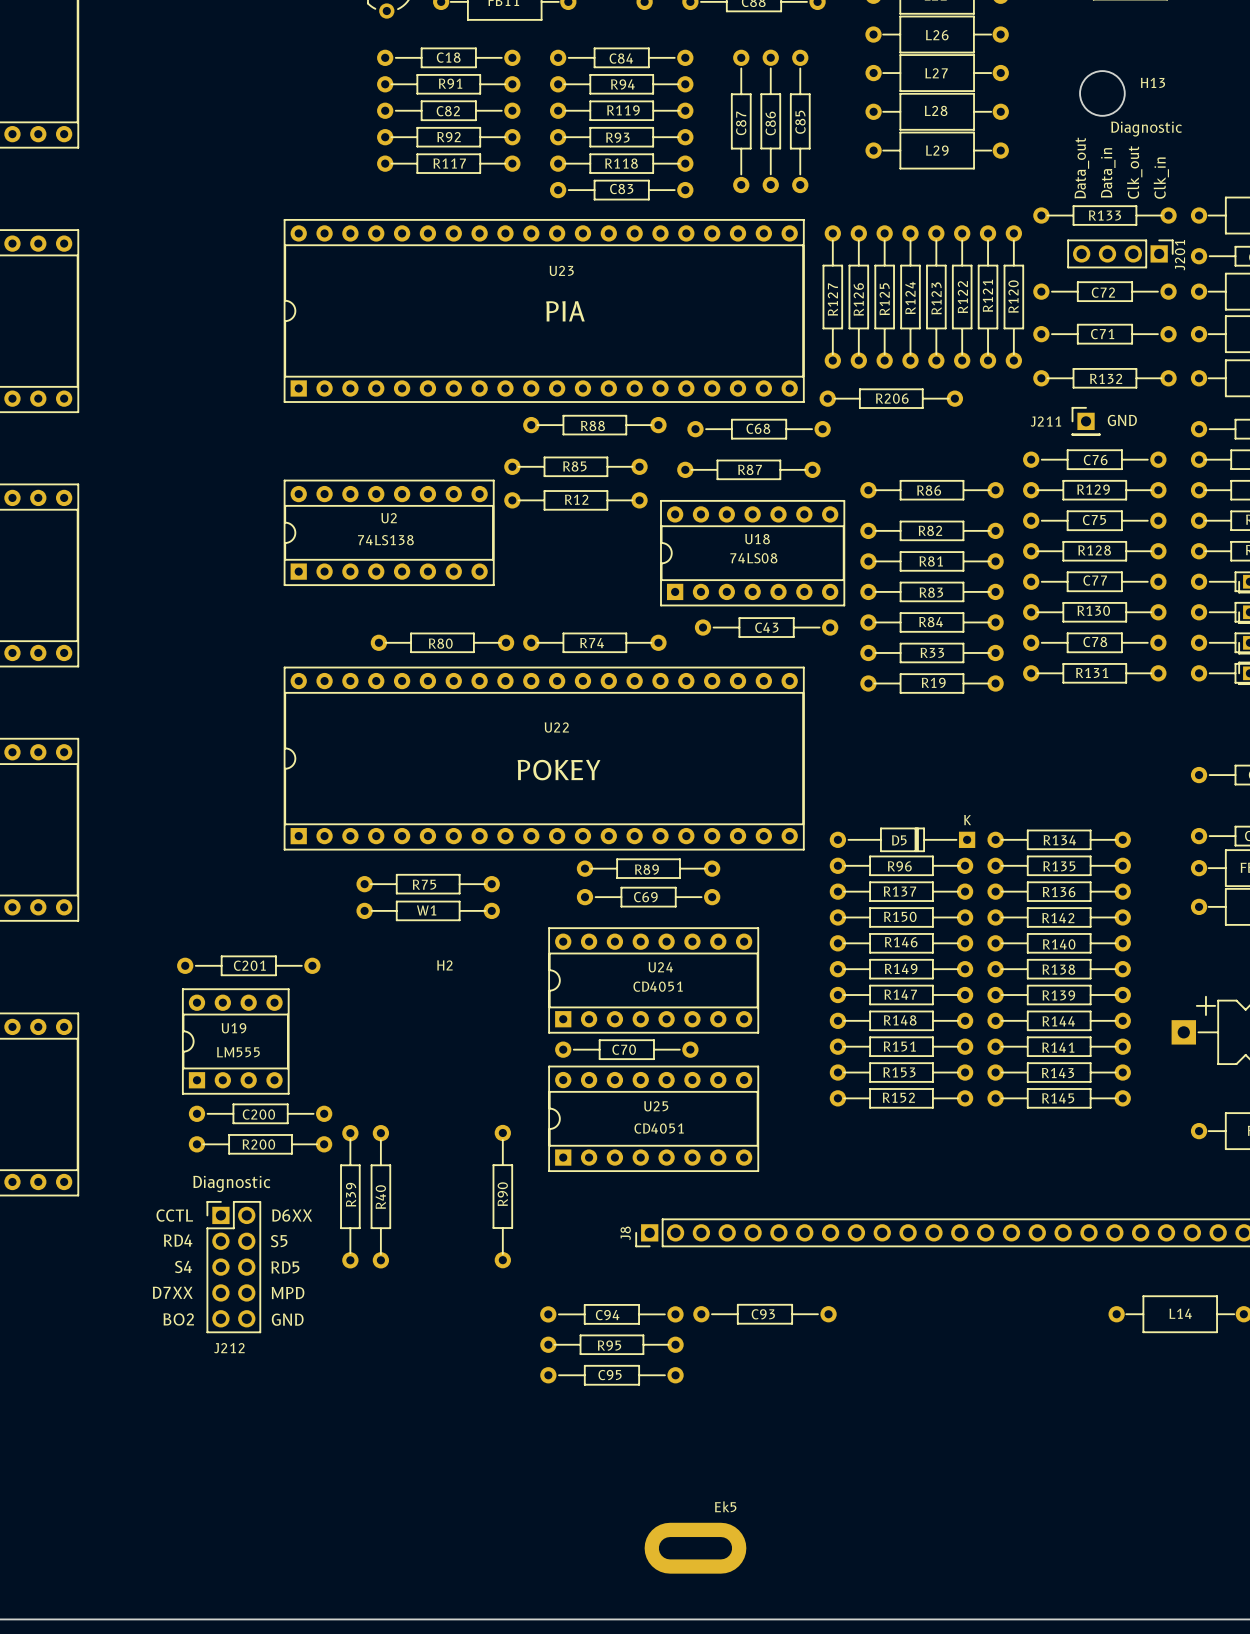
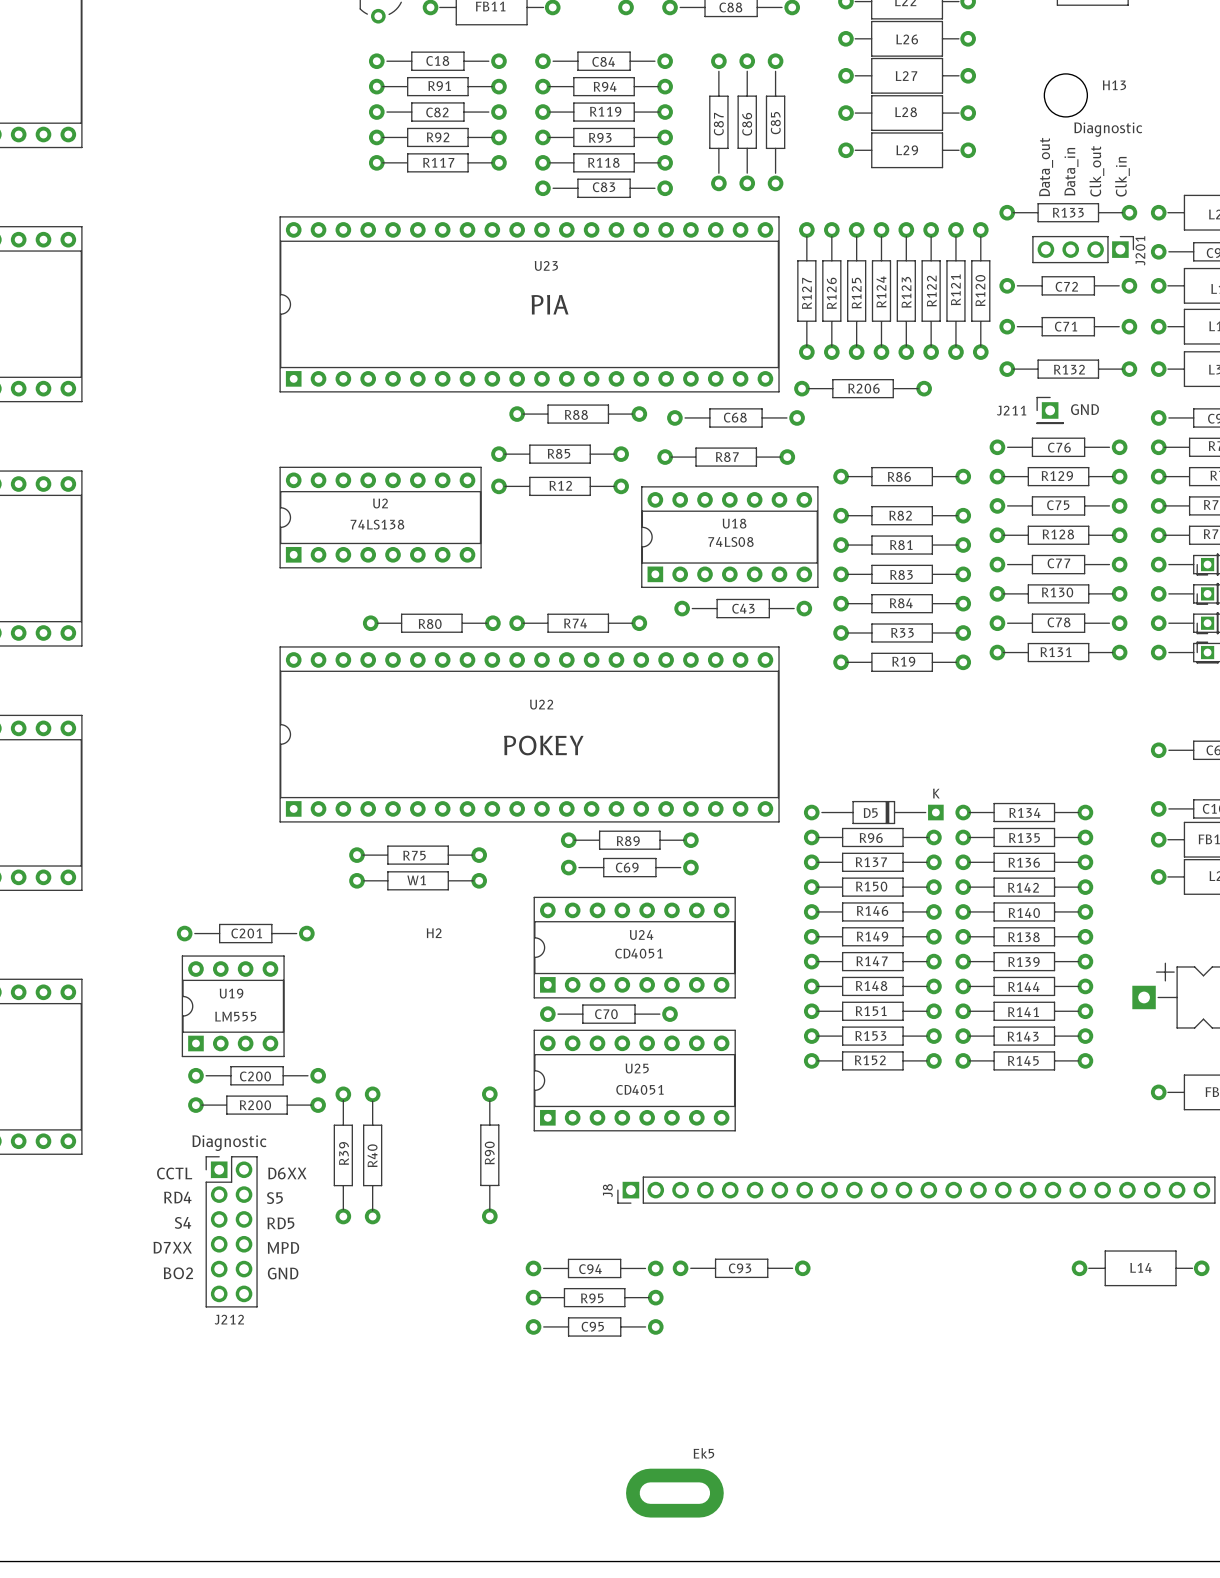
J212 footprint: [206, 1201, 261, 1333] -> [205, 1156, 258, 1308]

